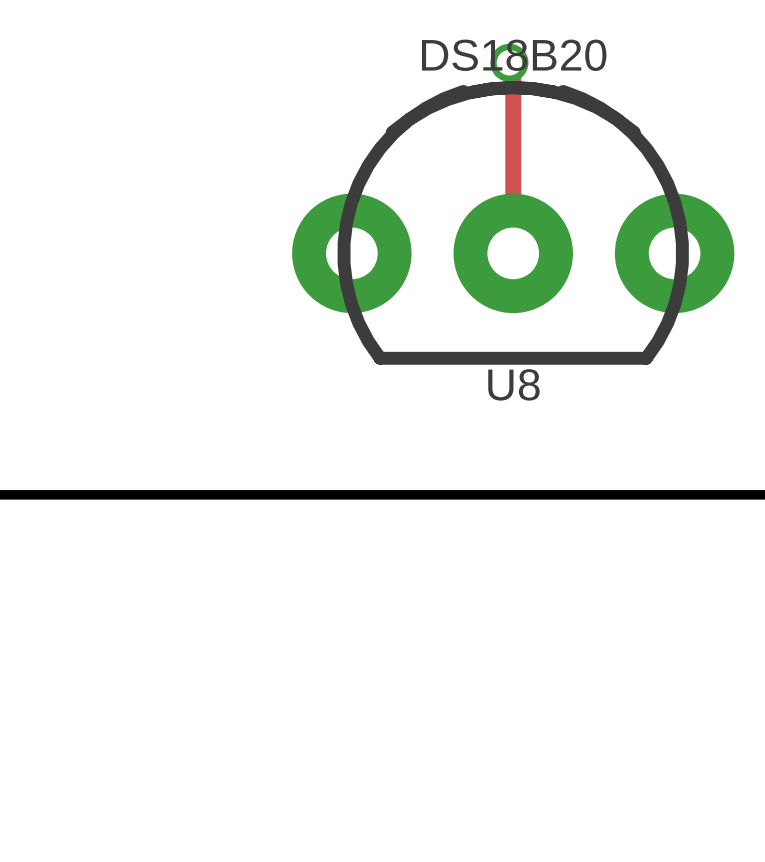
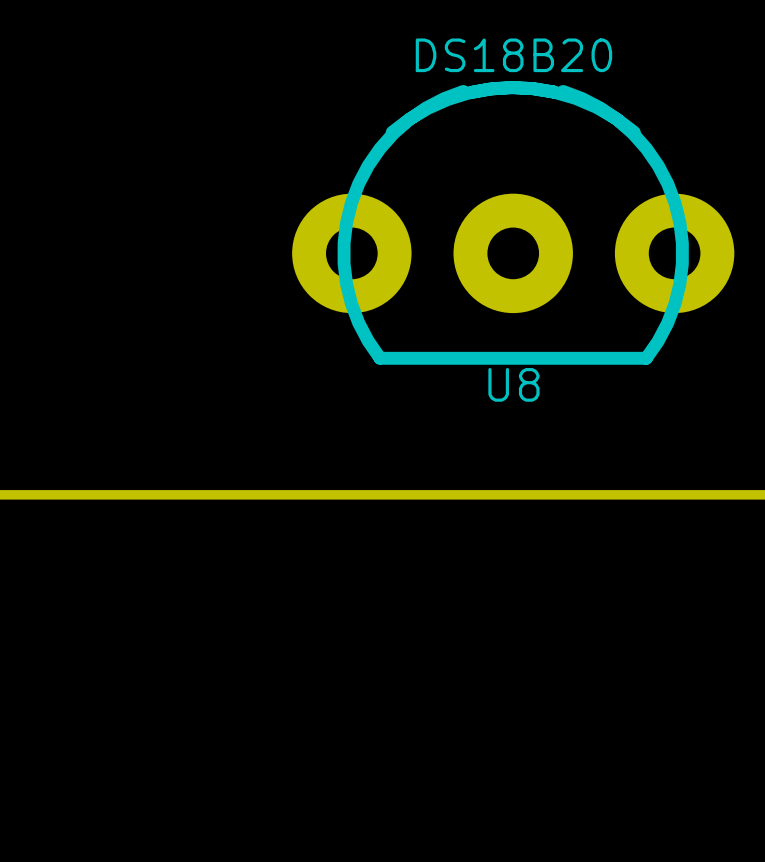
track: (509, 62) (513, 66) (513, 253) -> none
via: (509, 62) -> none

